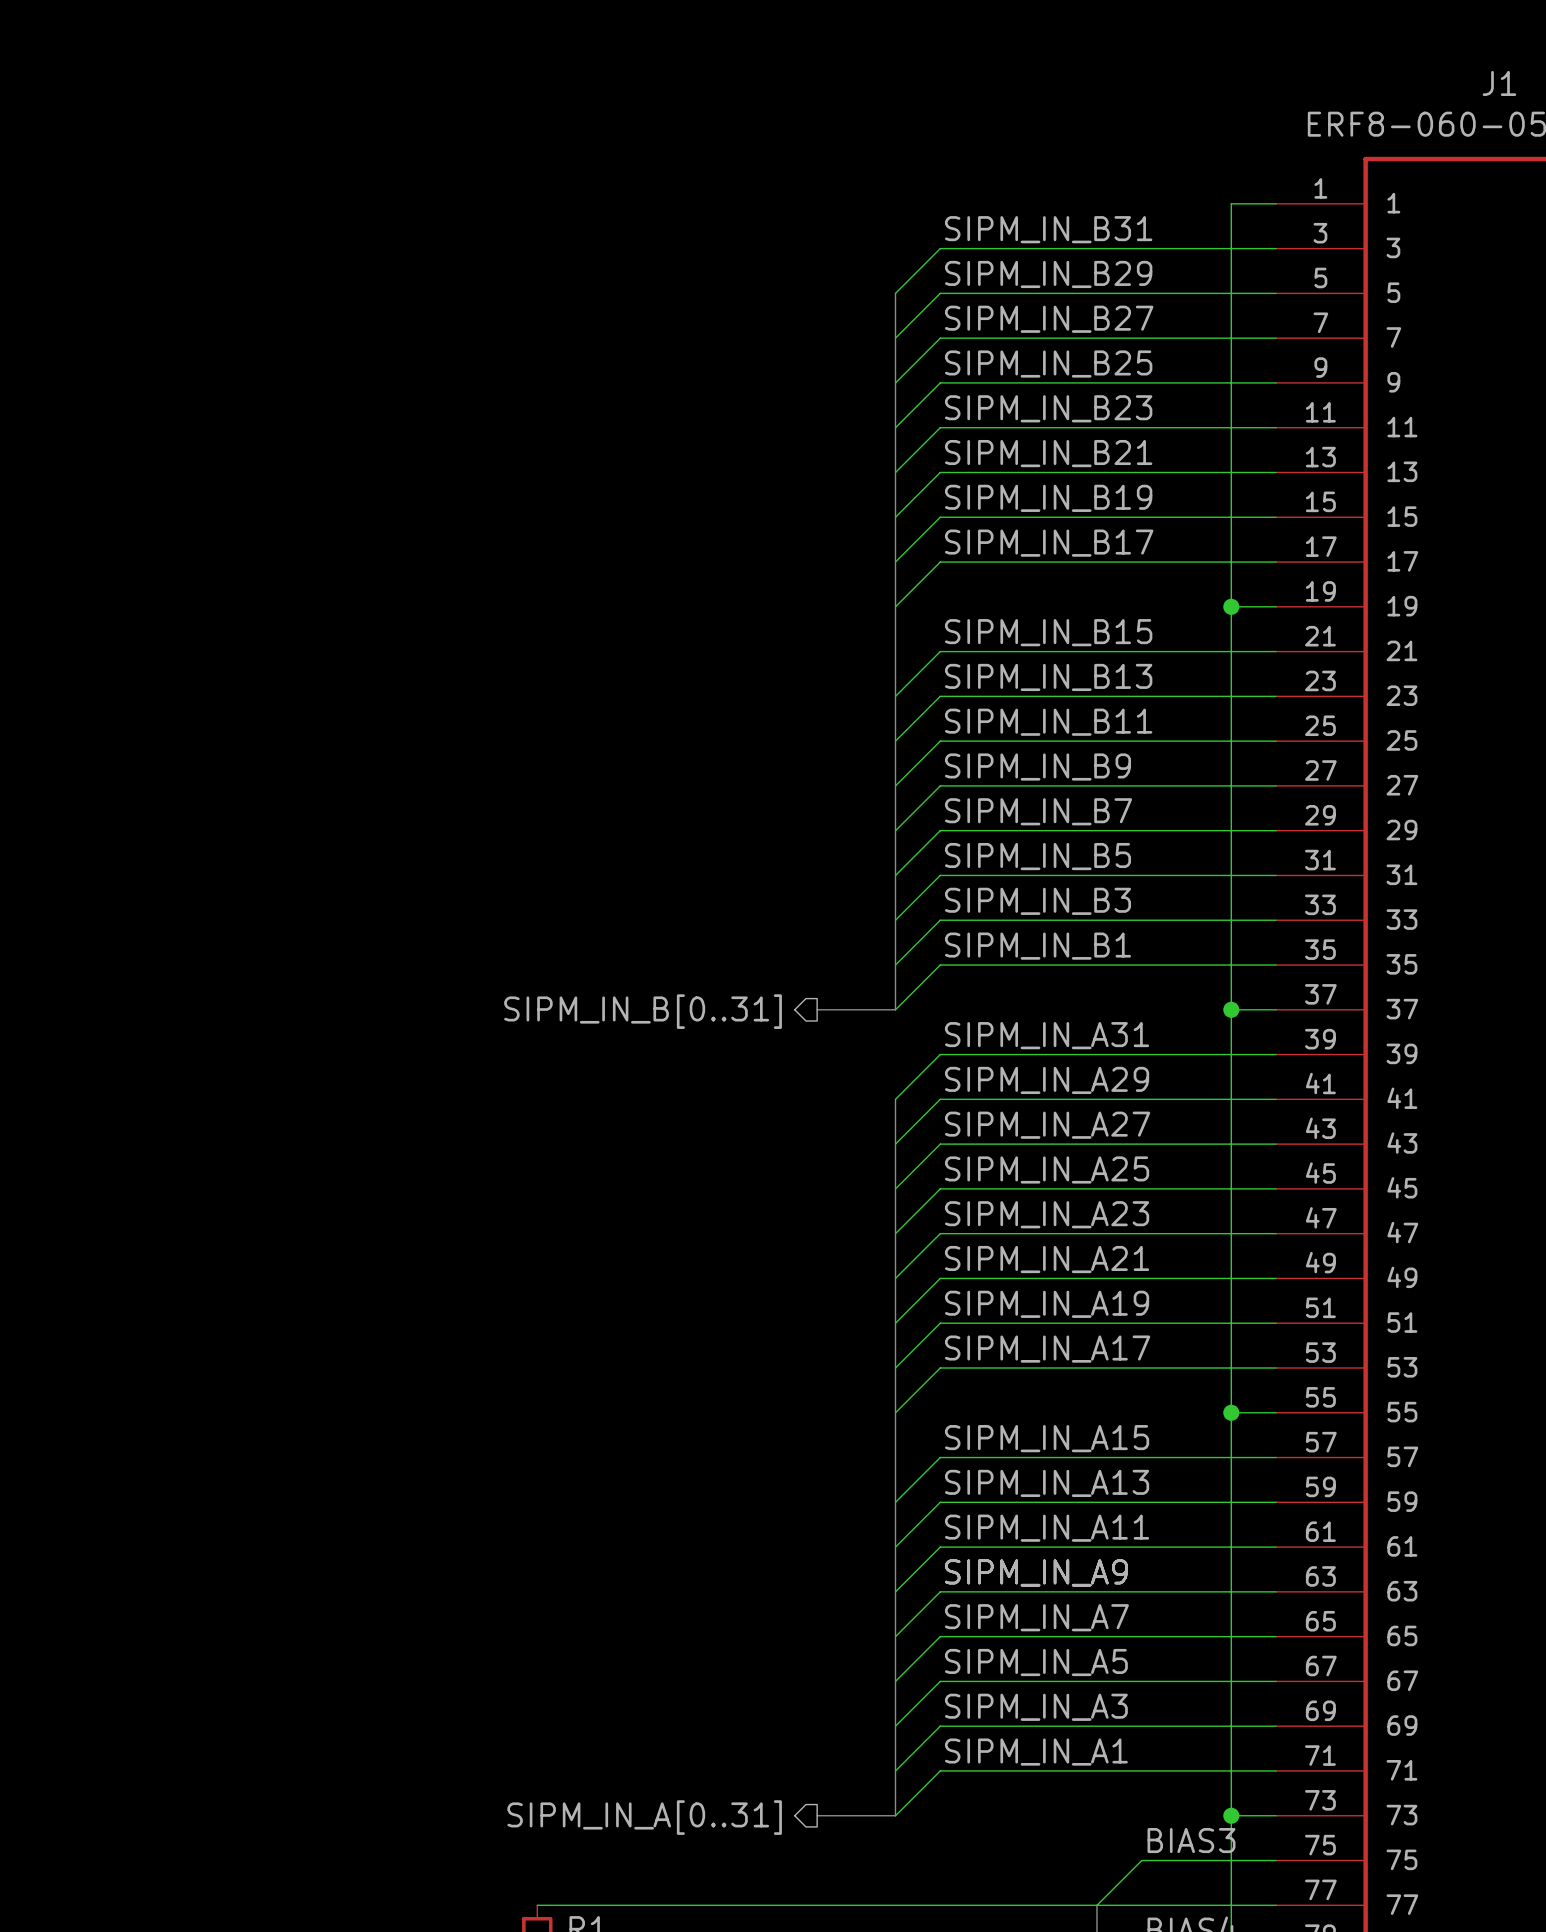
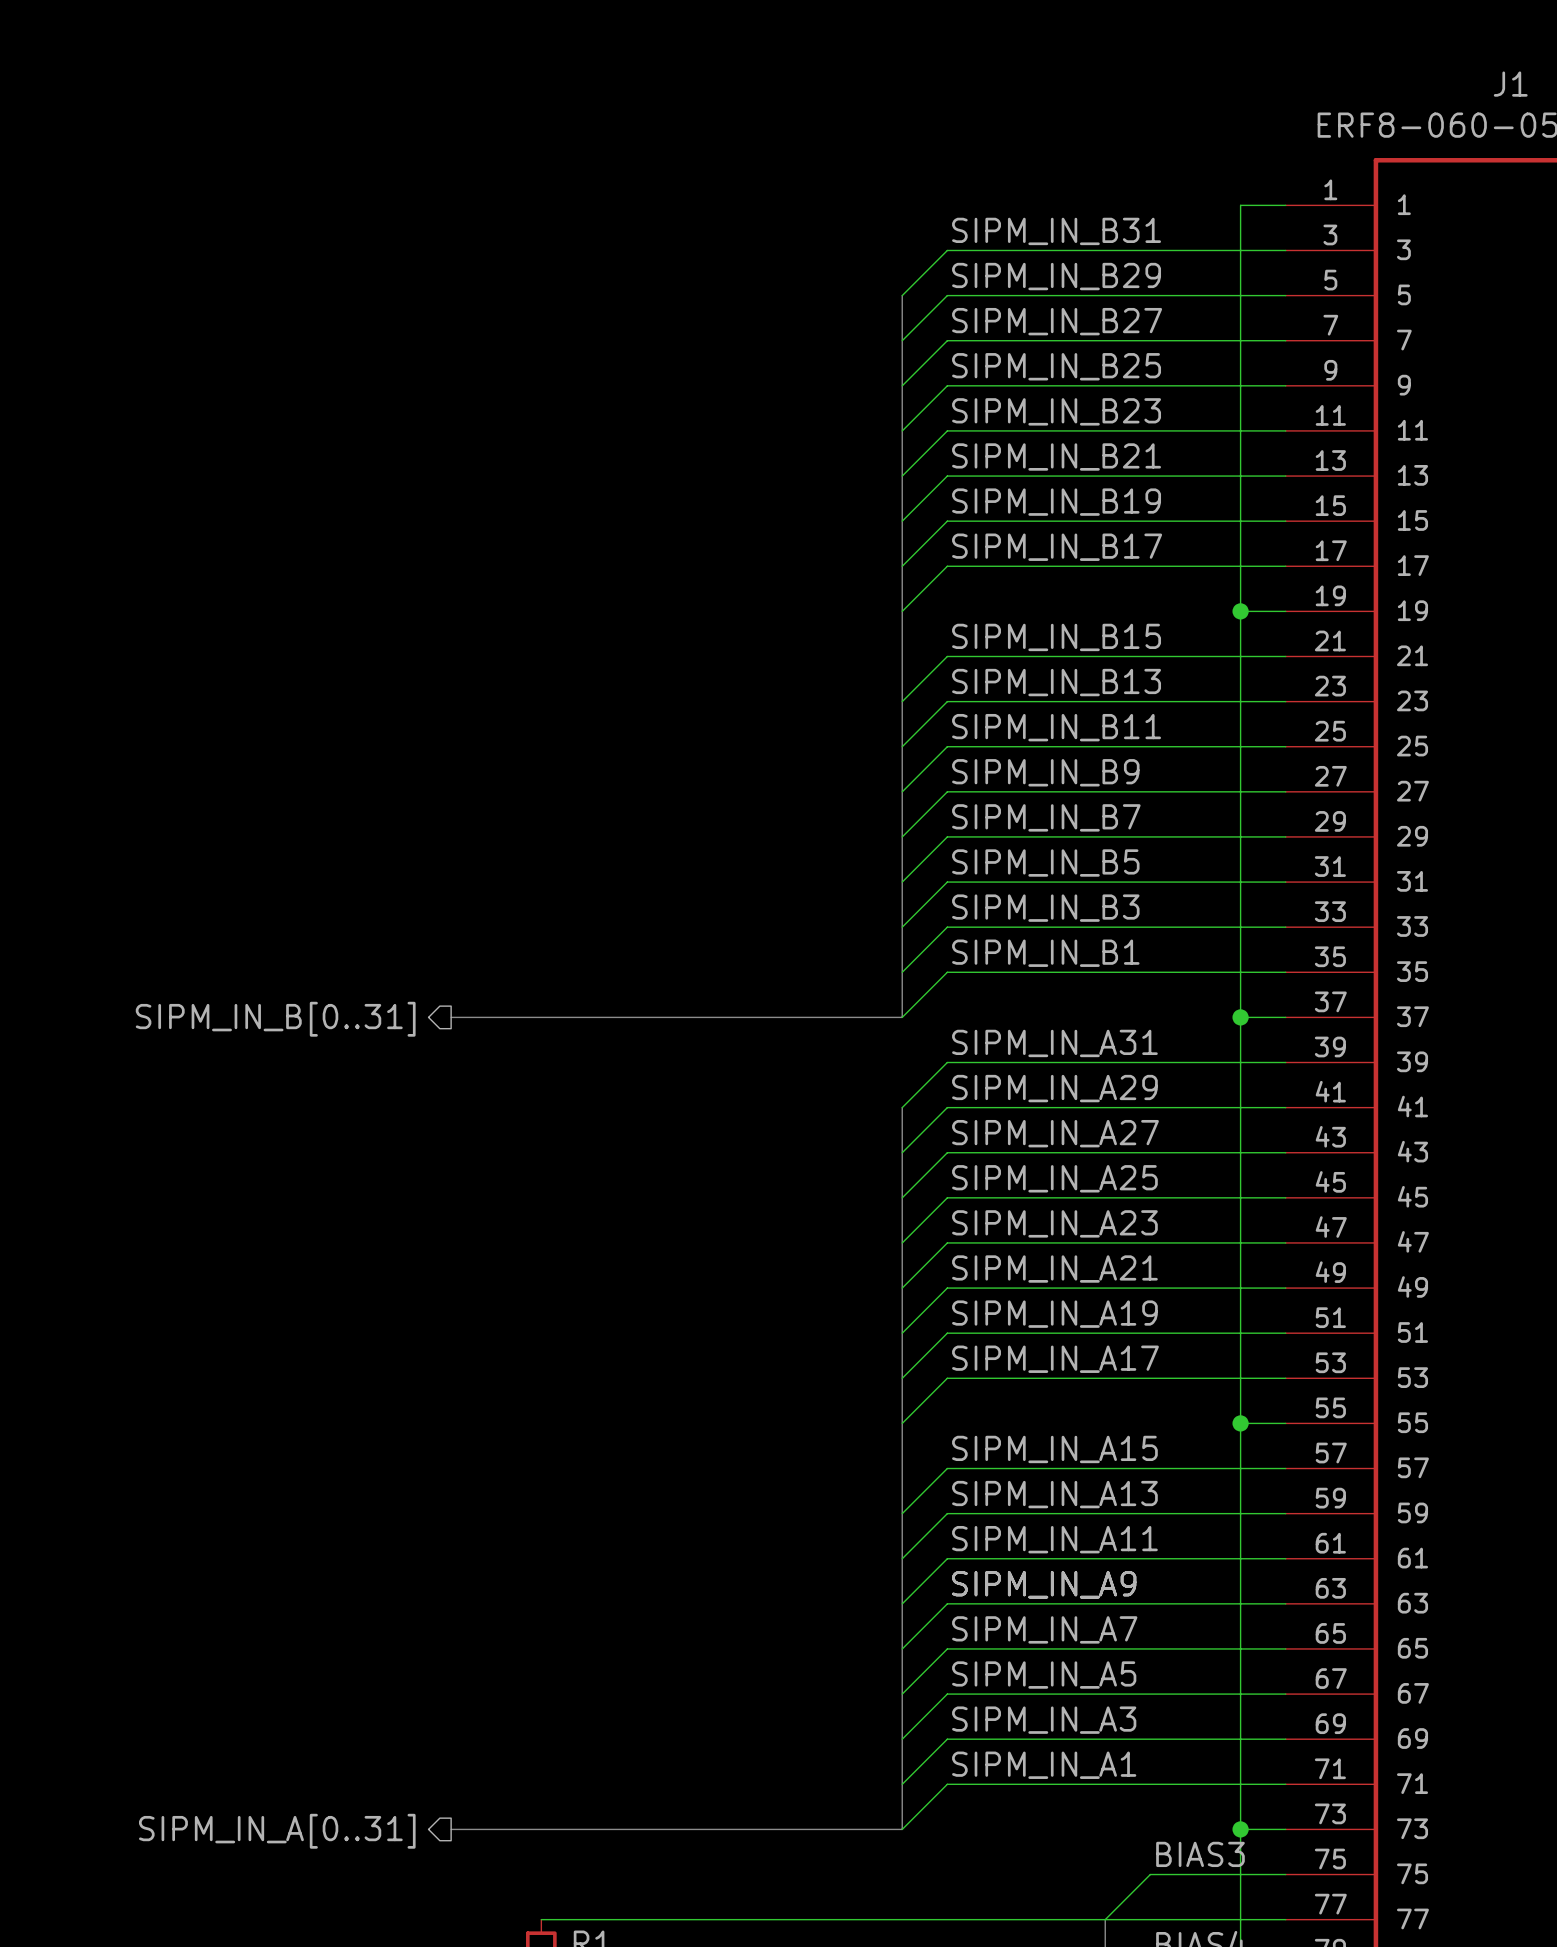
bus: none -> (451, 1017) (823, 1017)
hierarchical label position: SIPM_IN_B[0..31] (643, 1011) -> SIPM_IN_B[0..31] (275, 1019)
bus: none -> (451, 1829) (823, 1829)
hierarchical label position: SIPM_IN_A[0..31] (644, 1817) -> SIPM_IN_A[0..31] (277, 1831)

